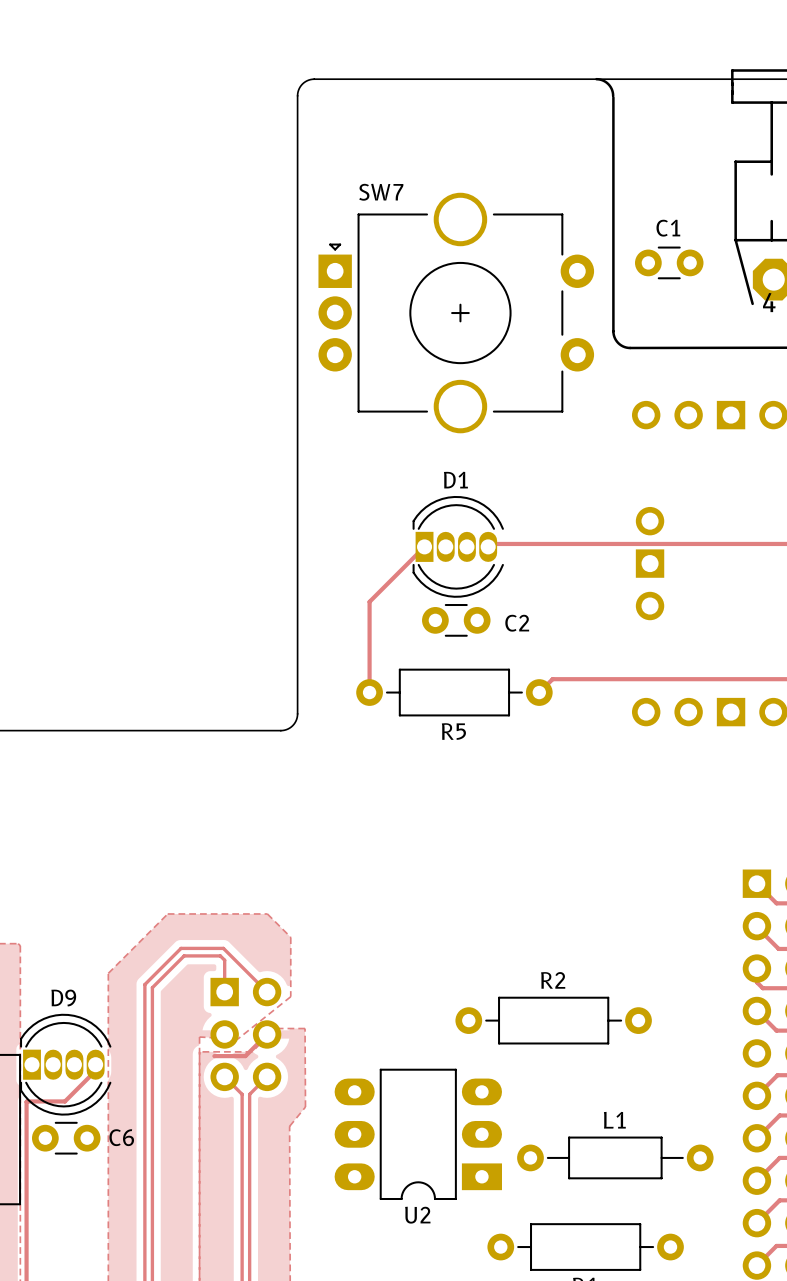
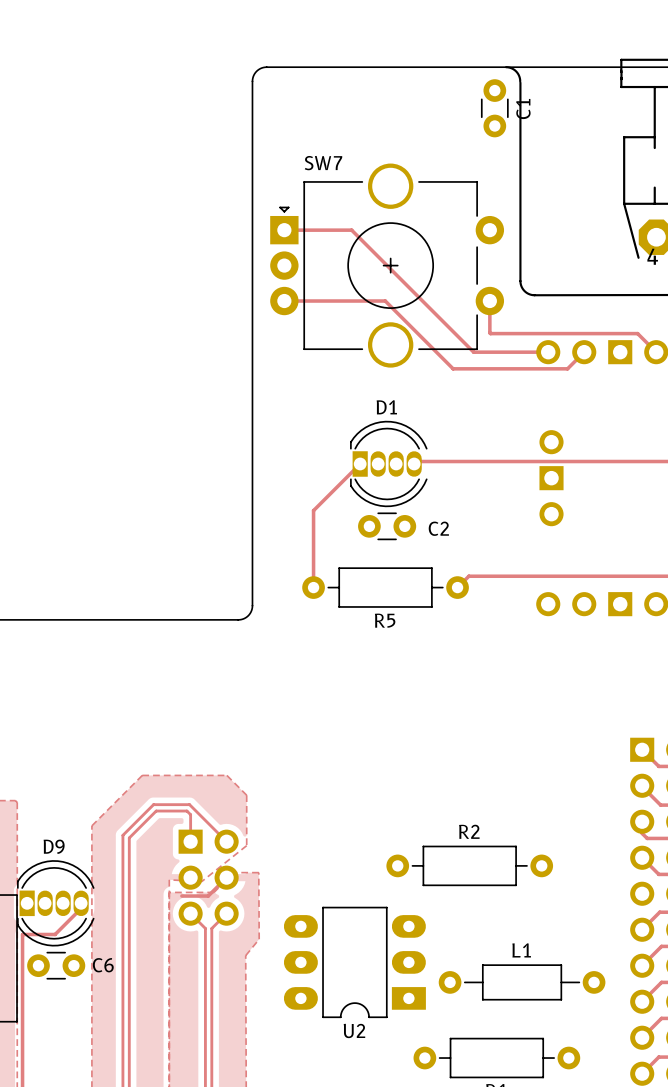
C1 rotation: 0° (669, 262) -> 90° clockwise (494, 108)
C1 position: (669, 262) -> (494, 108)
track: none -> (284, 230) (351, 230) (473, 352) (548, 352)
track: none -> (284, 301) (385, 301) (453, 368) (567, 368) (584, 352)
track: none -> (489, 301) (490, 333) (637, 333) (656, 352)

